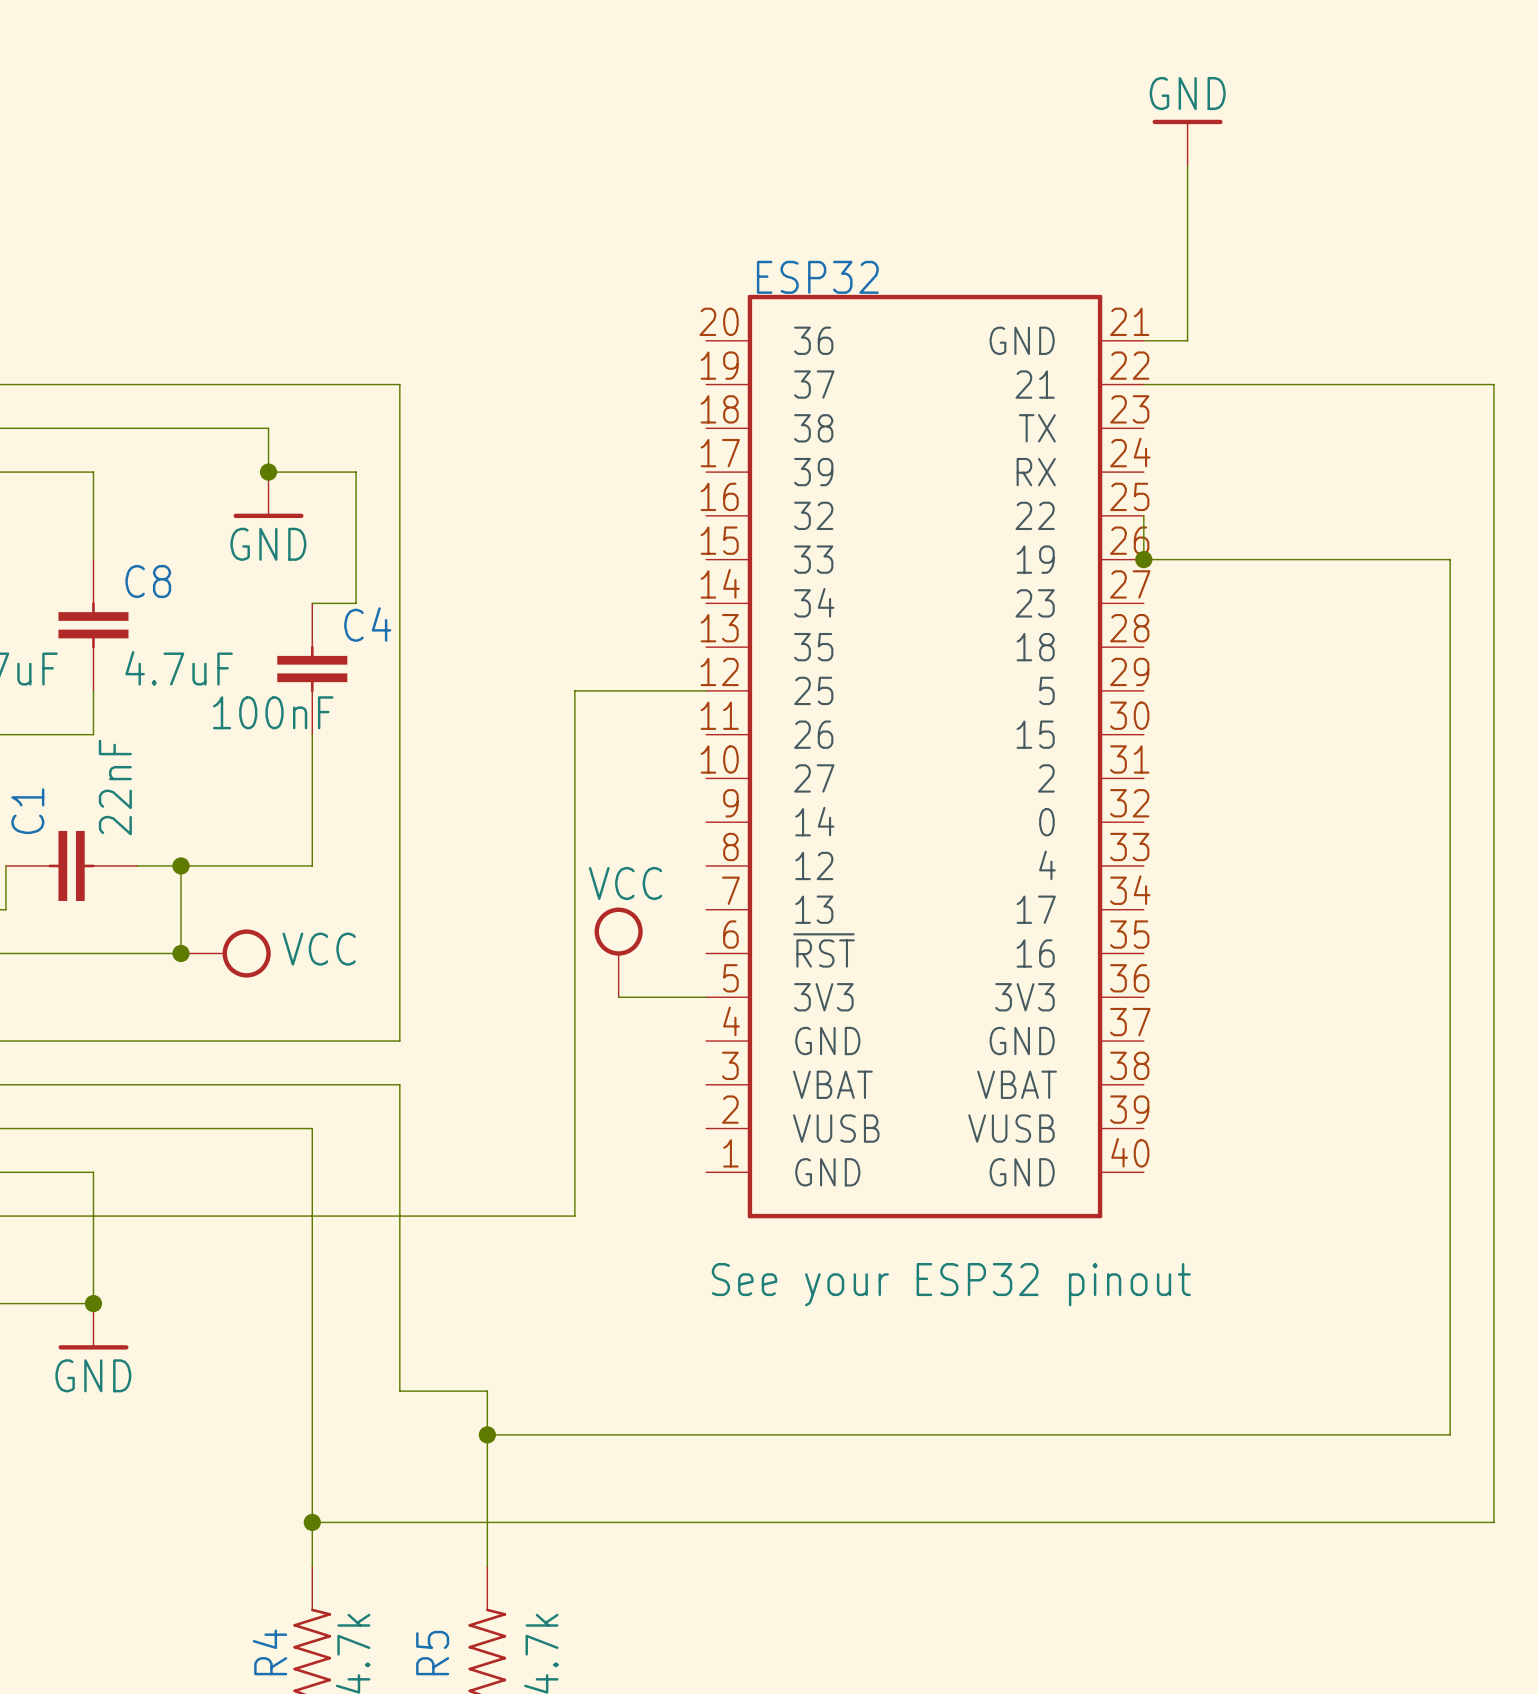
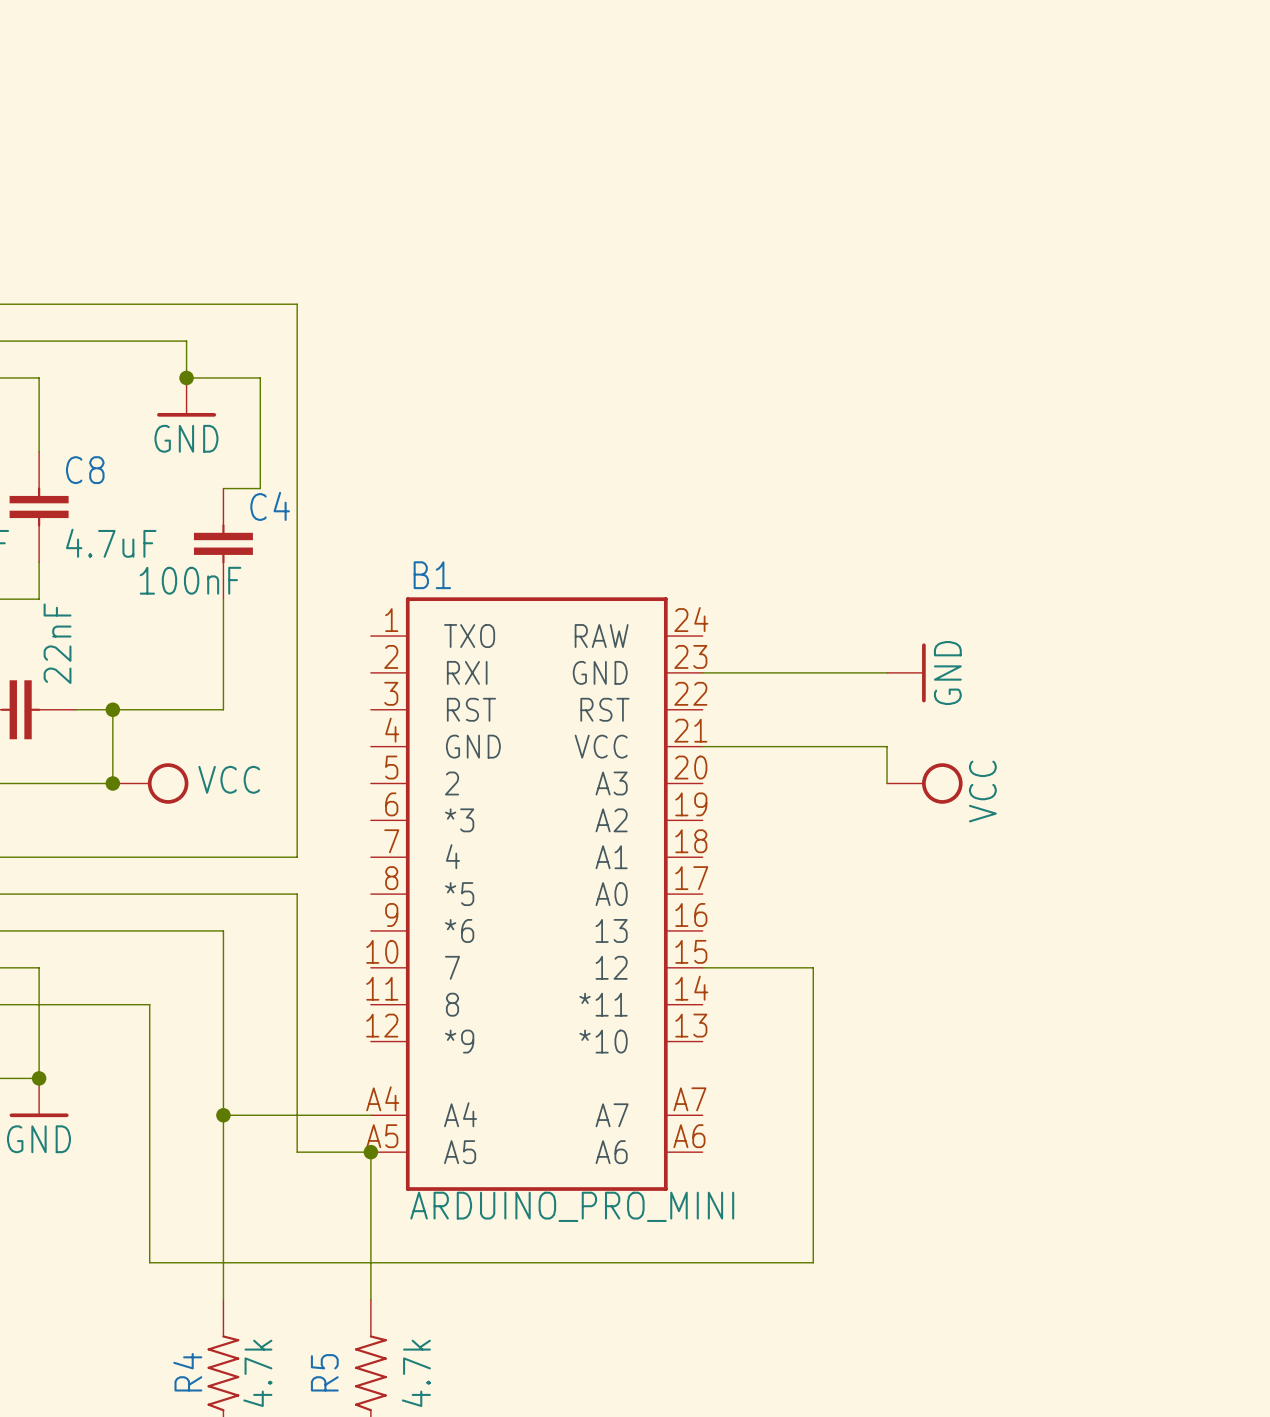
power symbol: GND (1187, 142) -> none
wire: (1187, 165) (1187, 340) (1143, 340) -> none
wire: (1143, 384) (1493, 384) (1493, 1522) (1012, 1522) -> (702, 967) (813, 967) (813, 1262)
wire: (1143, 515) (1143, 559) (1450, 559) (1450, 1434) (487, 1434) -> none
junction: (1143, 559) -> none
wire: (706, 690) (574, 690) (574, 1216) (224, 1216) -> (223, 1262) (149, 1262) (149, 1004)
ESP32: See your ESP32 pinout (924, 756) -> none
wire: none -> (702, 672) (887, 672)
power symbol: none -> GND (906, 672)
wire: none -> (702, 746) (887, 746) (887, 783)
power symbol: VCC (618, 952) -> none
power symbol: none -> VCC (924, 783)
wire: (618, 997) (706, 997) -> none
B1: none -> ARDUINO_PRO_MINI (536, 894)
wire: none -> (223, 1115) (370, 1115)
junction: none -> (223, 1115)
junction position: (487, 1434) -> (370, 1152)
junction: (312, 1522) -> none

